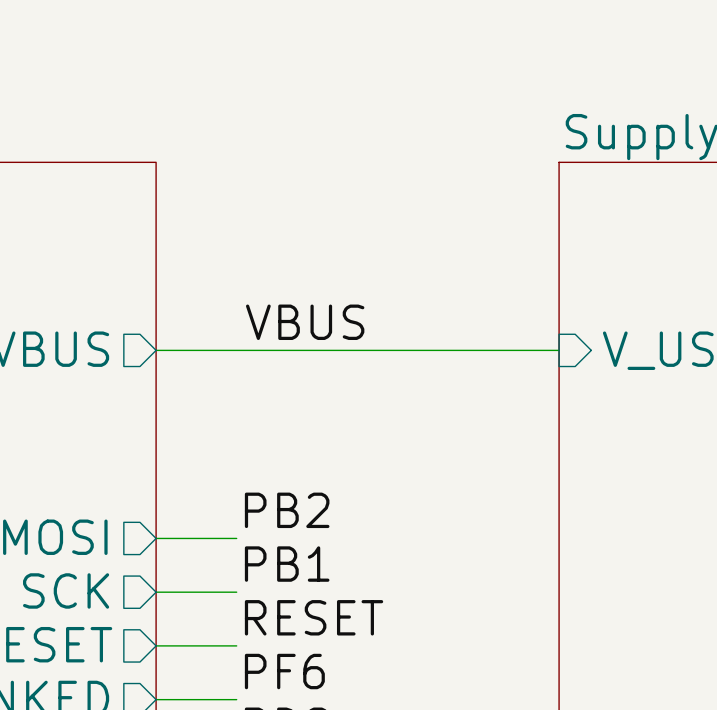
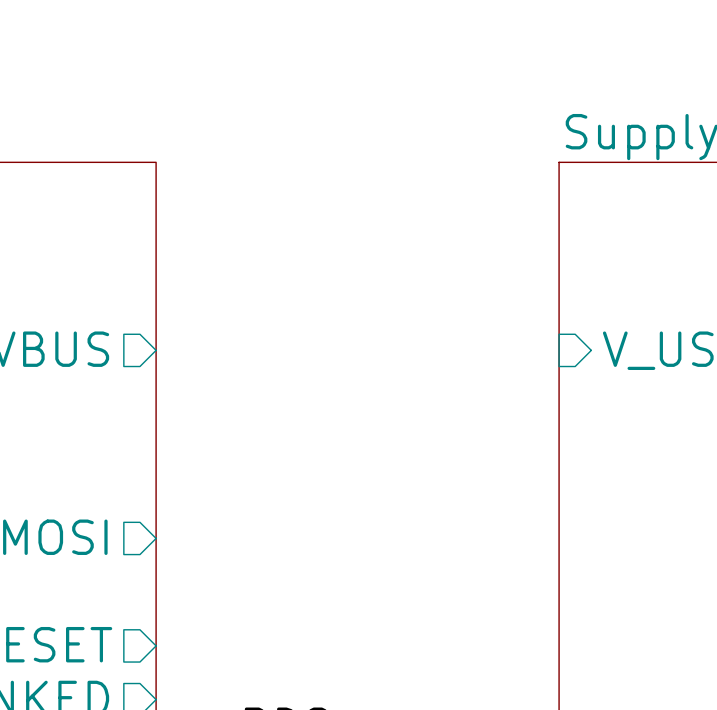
label: VBUS (305, 322) -> none
wire: (156, 350) (559, 350) -> none
label: PB2 (287, 510) -> none
wire: (156, 538) (236, 538) -> none
label: PB1 (287, 564) -> none
sheet pin: SCK (66, 590) -> none
wire: (156, 592) (236, 592) -> none
label: RESET (314, 617) -> none
wire: (156, 645) (236, 645) -> none
label: PF6 (284, 671) -> none
wire: (156, 699) (236, 699) -> none

